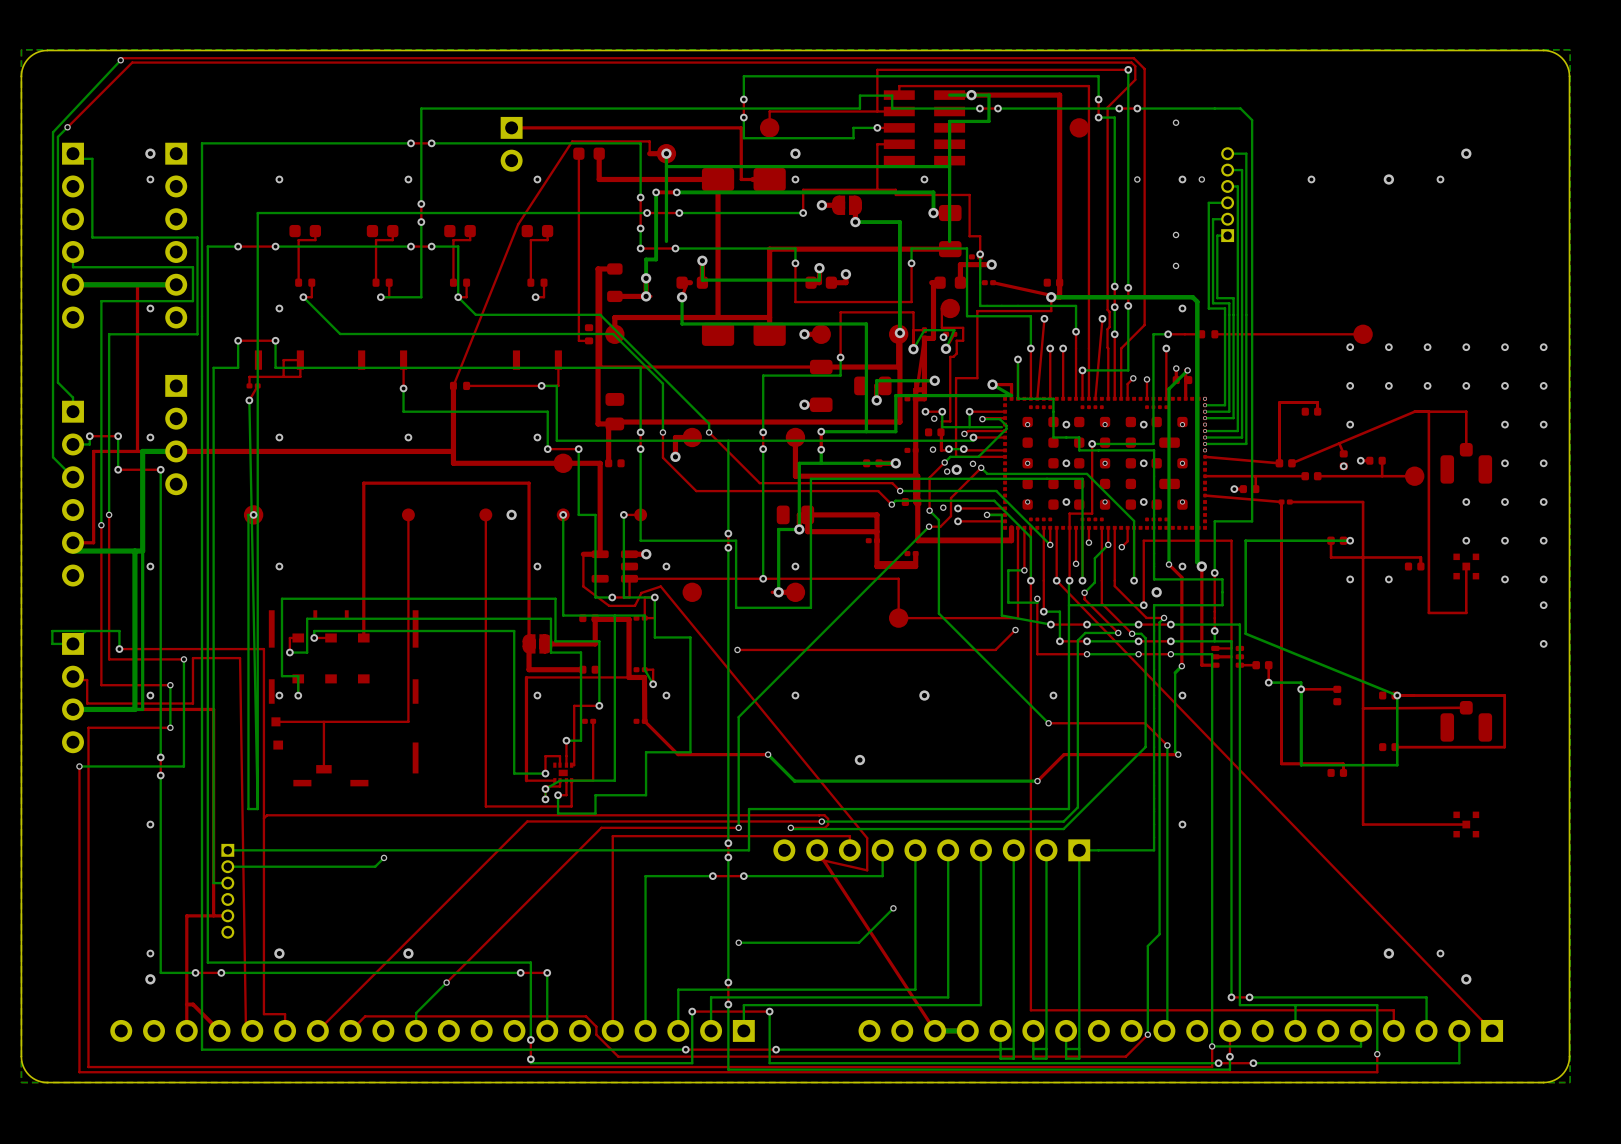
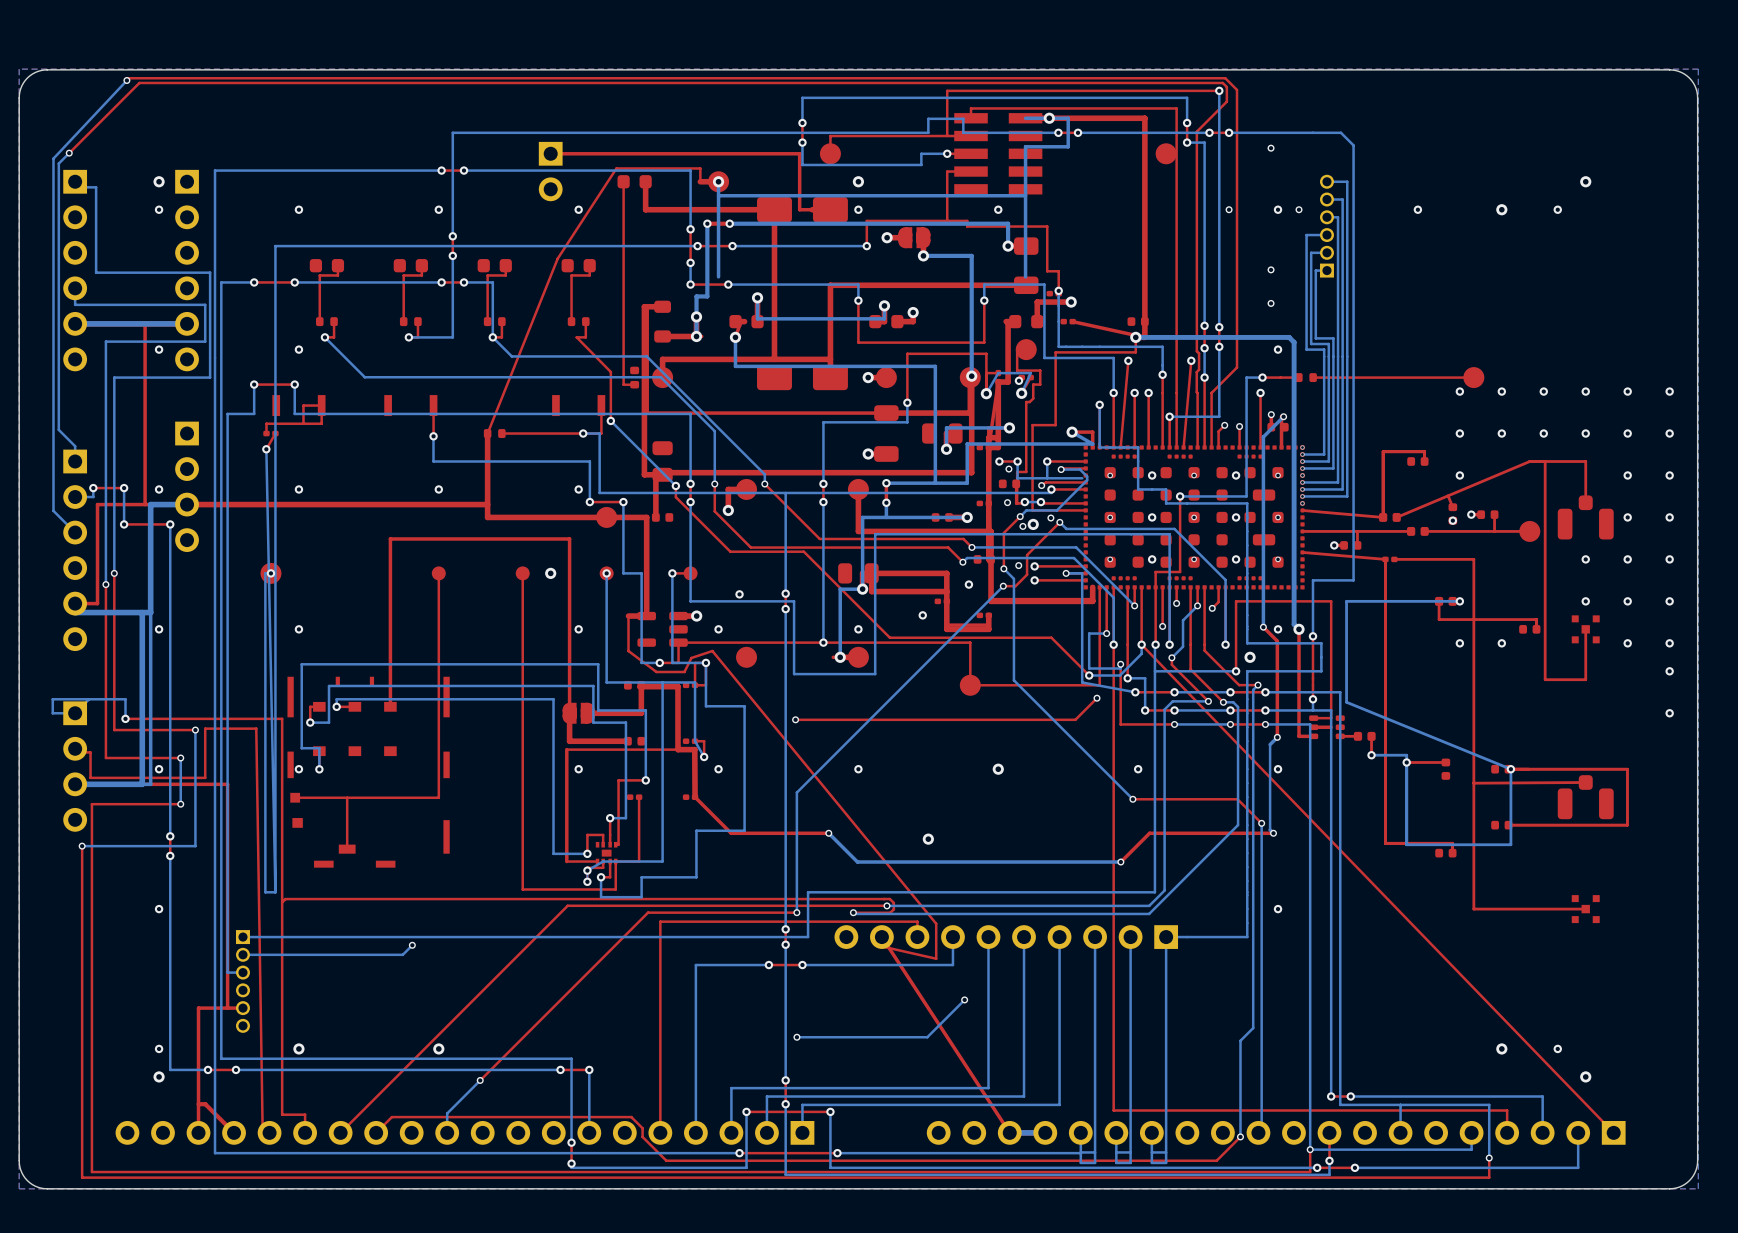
top track: none -> (576, 337) (610, 371) (610, 420)
via: (535, 297) -> none
bottom track: none -> (610, 420) (675, 485)
via: none -> (610, 420)
top track: none -> (675, 485) (675, 497) (730, 551) (803, 551) (889, 637) (1051, 637) (1089, 675)
via: none -> (675, 485)
via: none -> (968, 584)
via: none -> (739, 594)
via: none -> (922, 615)
bottom track: none -> (1141, 644) (1141, 653) (1119, 675) (1089, 675)
via: none -> (1089, 675)

